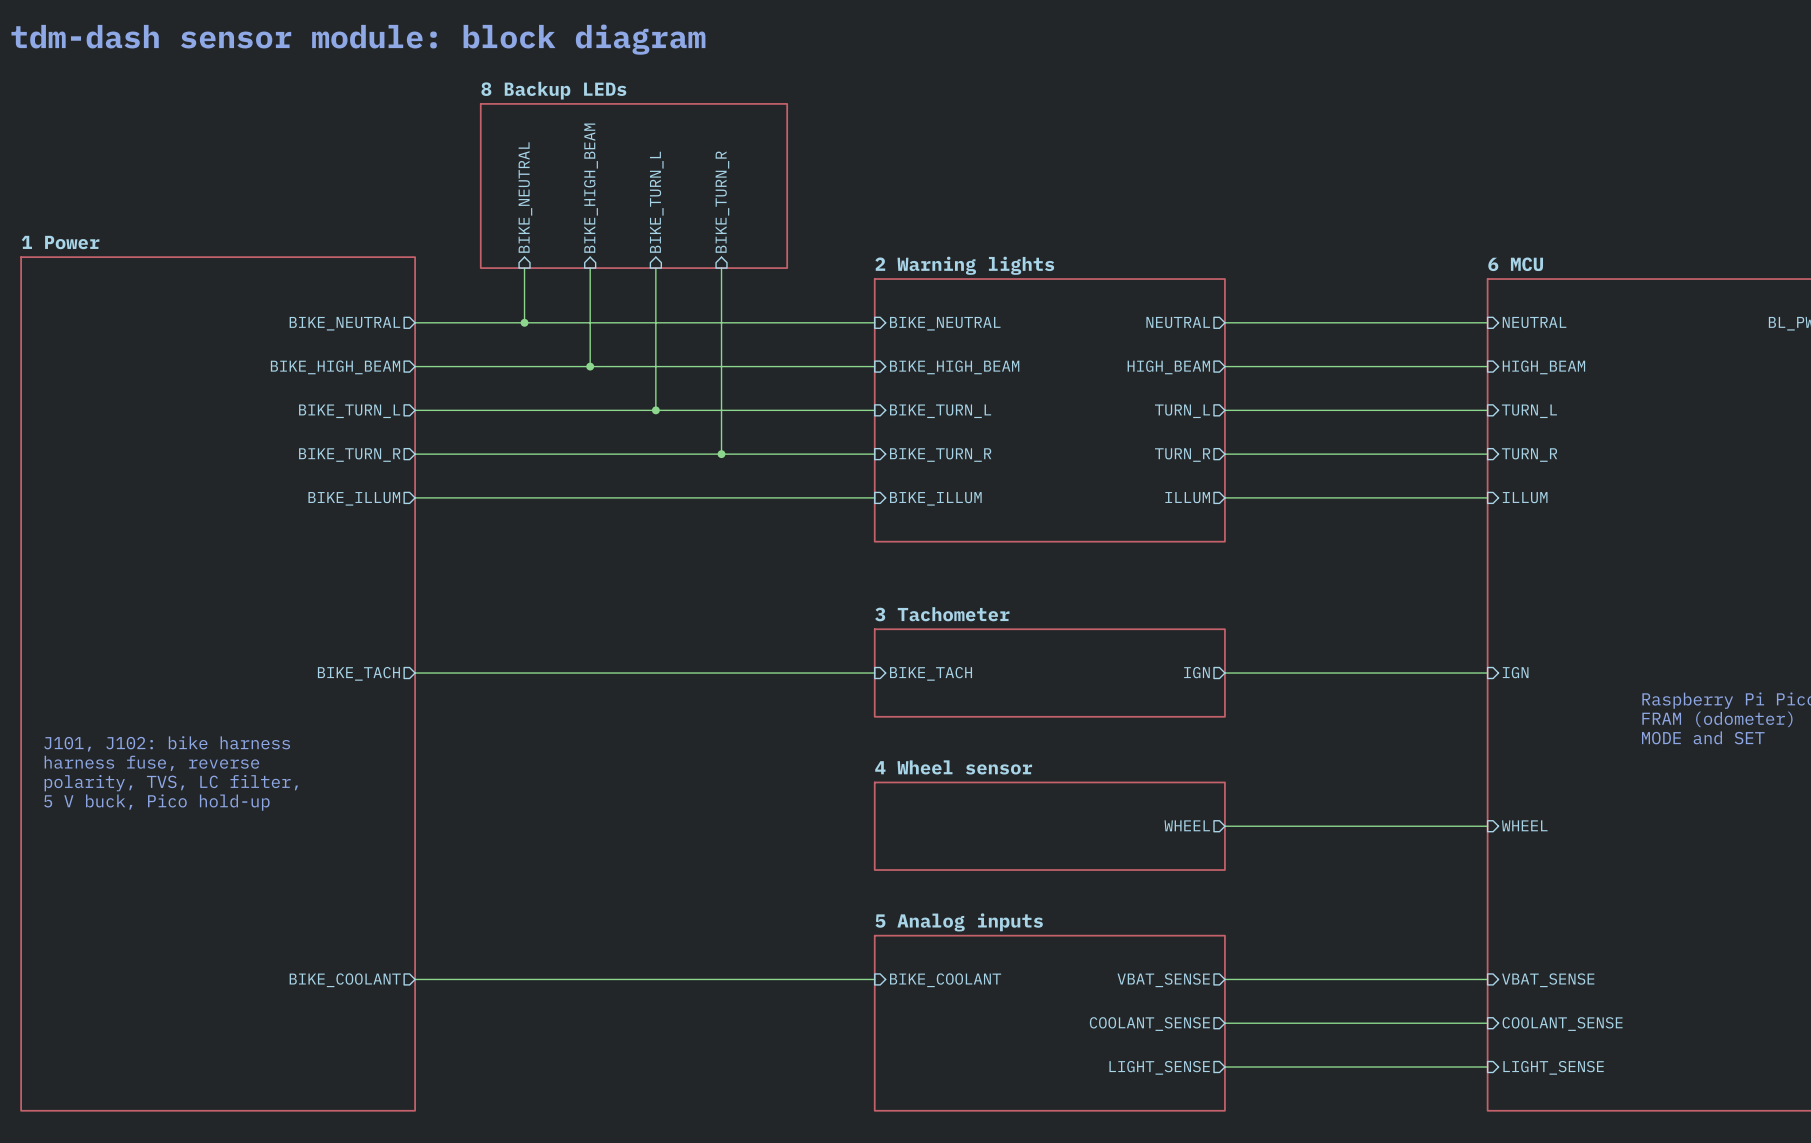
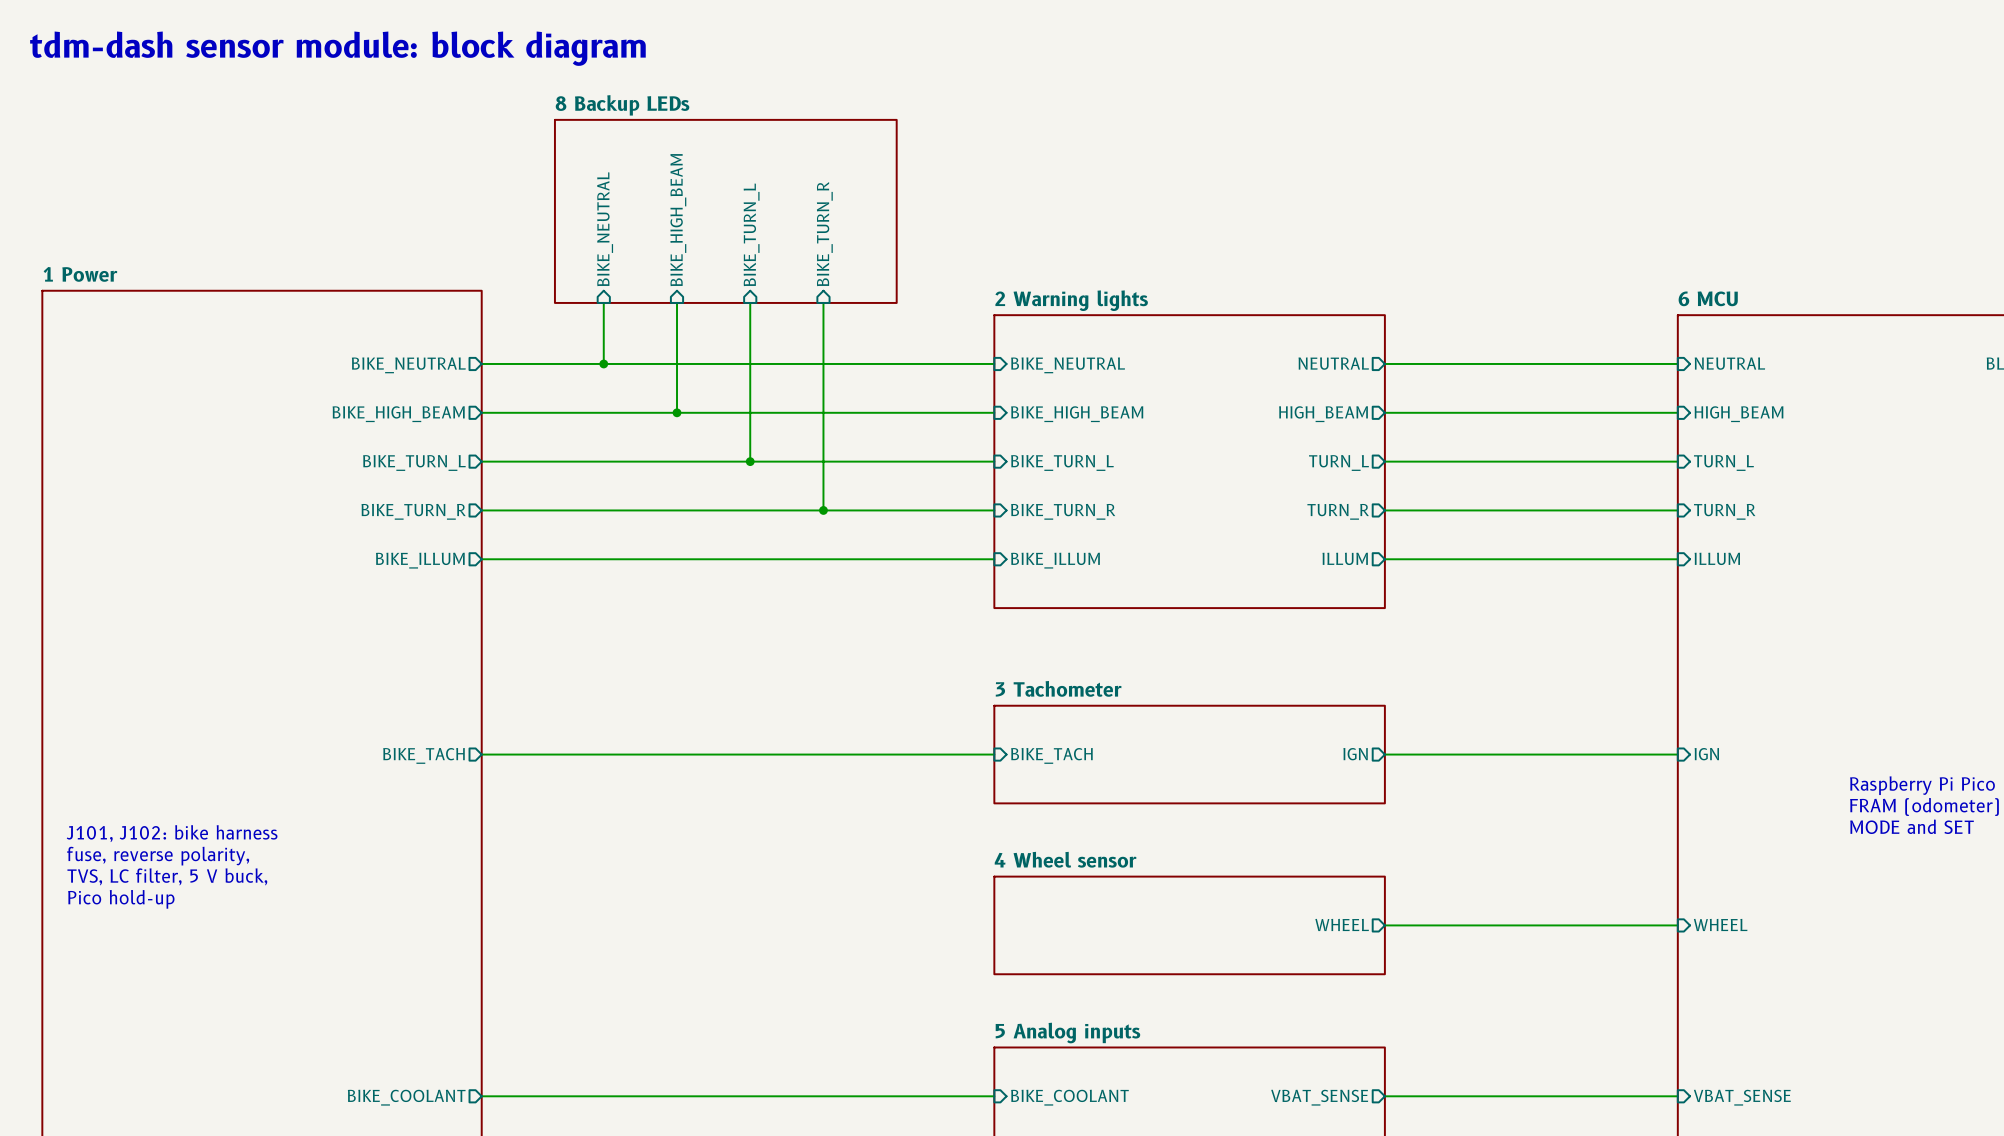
text: harness fuse, reverse (151, 763) -> fuse, reverse polarity, (158, 856)
text: polarity, TVS, LC filter, (171, 783) -> TVS, LC filter, 5 V buck, (167, 876)
text: 5 V buck, Pico hold-up (156, 802) -> Pico hold-up (121, 899)

